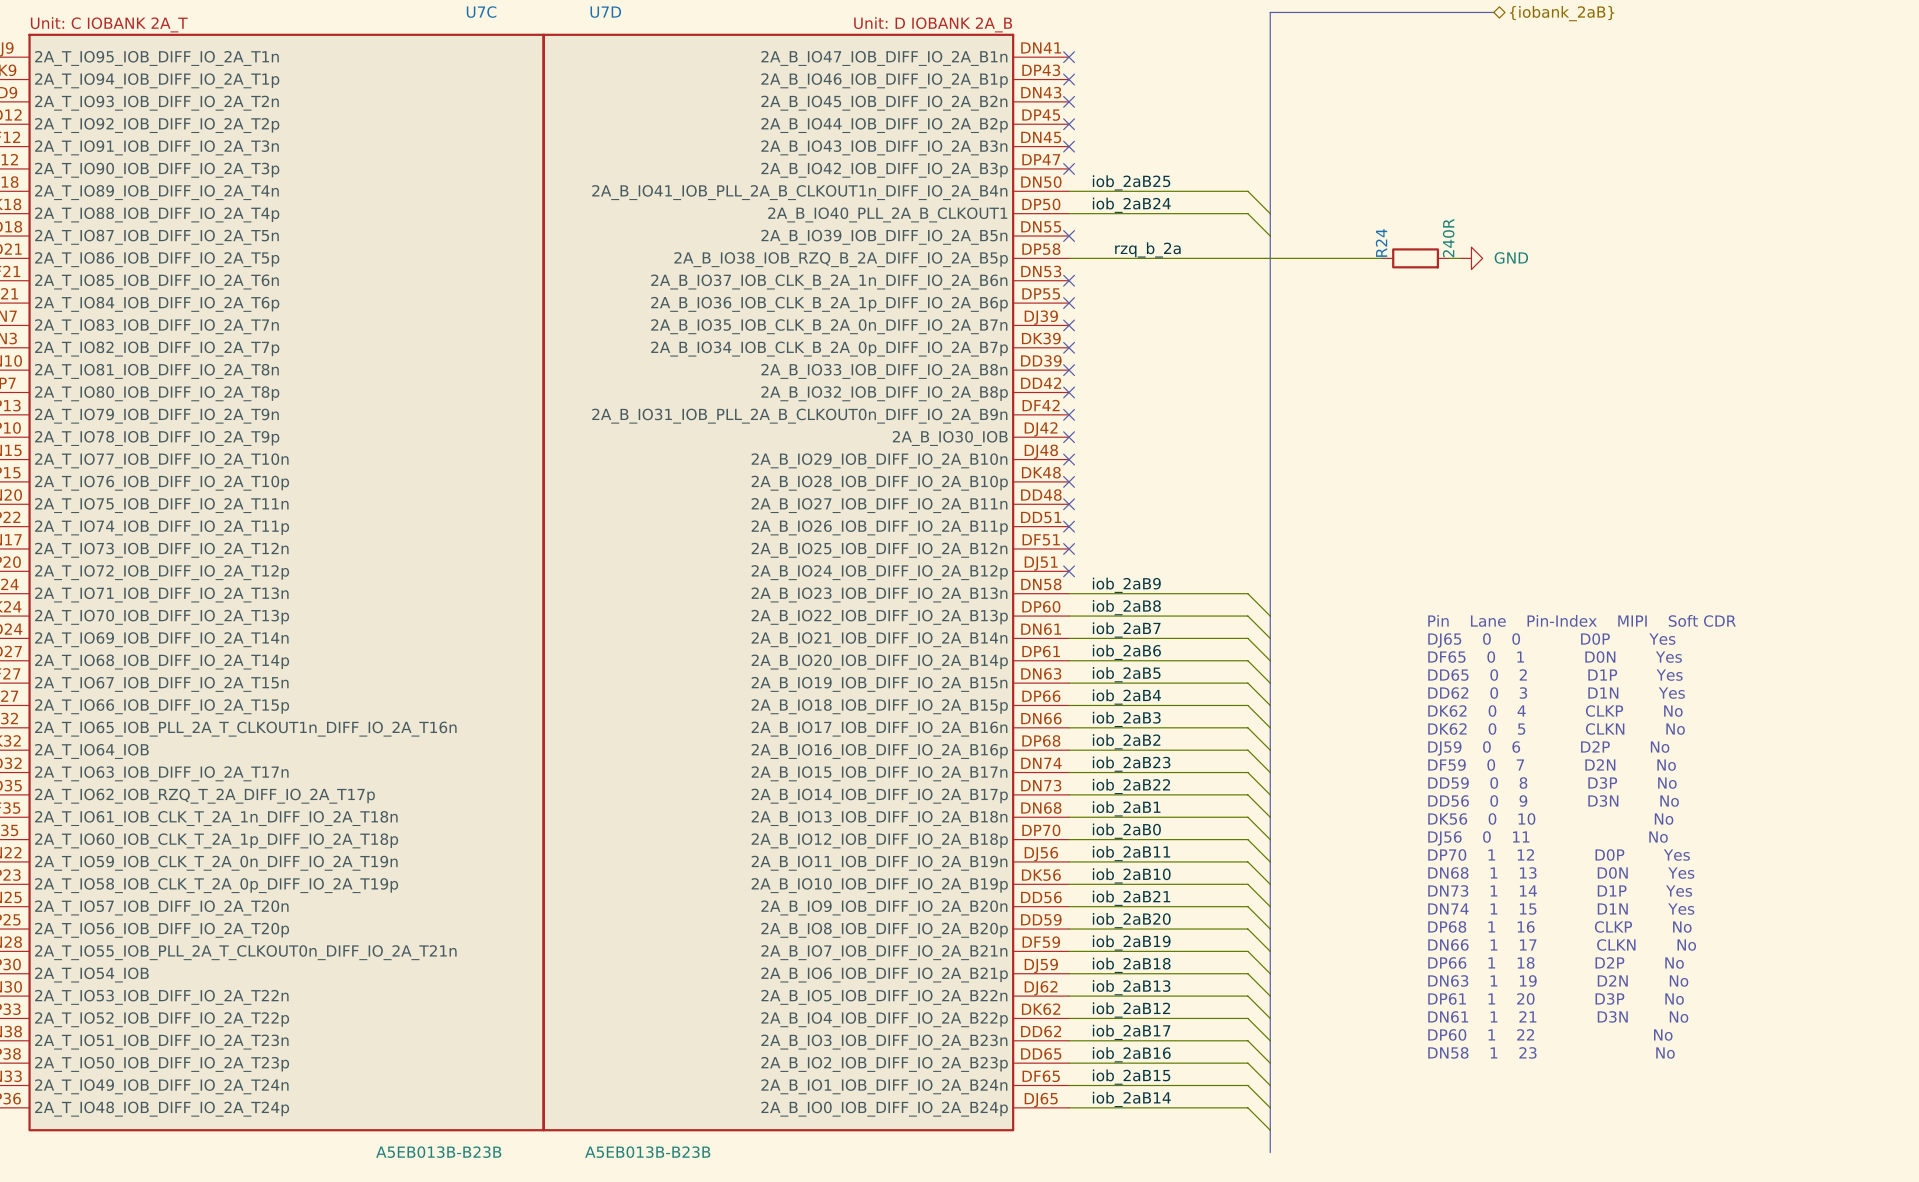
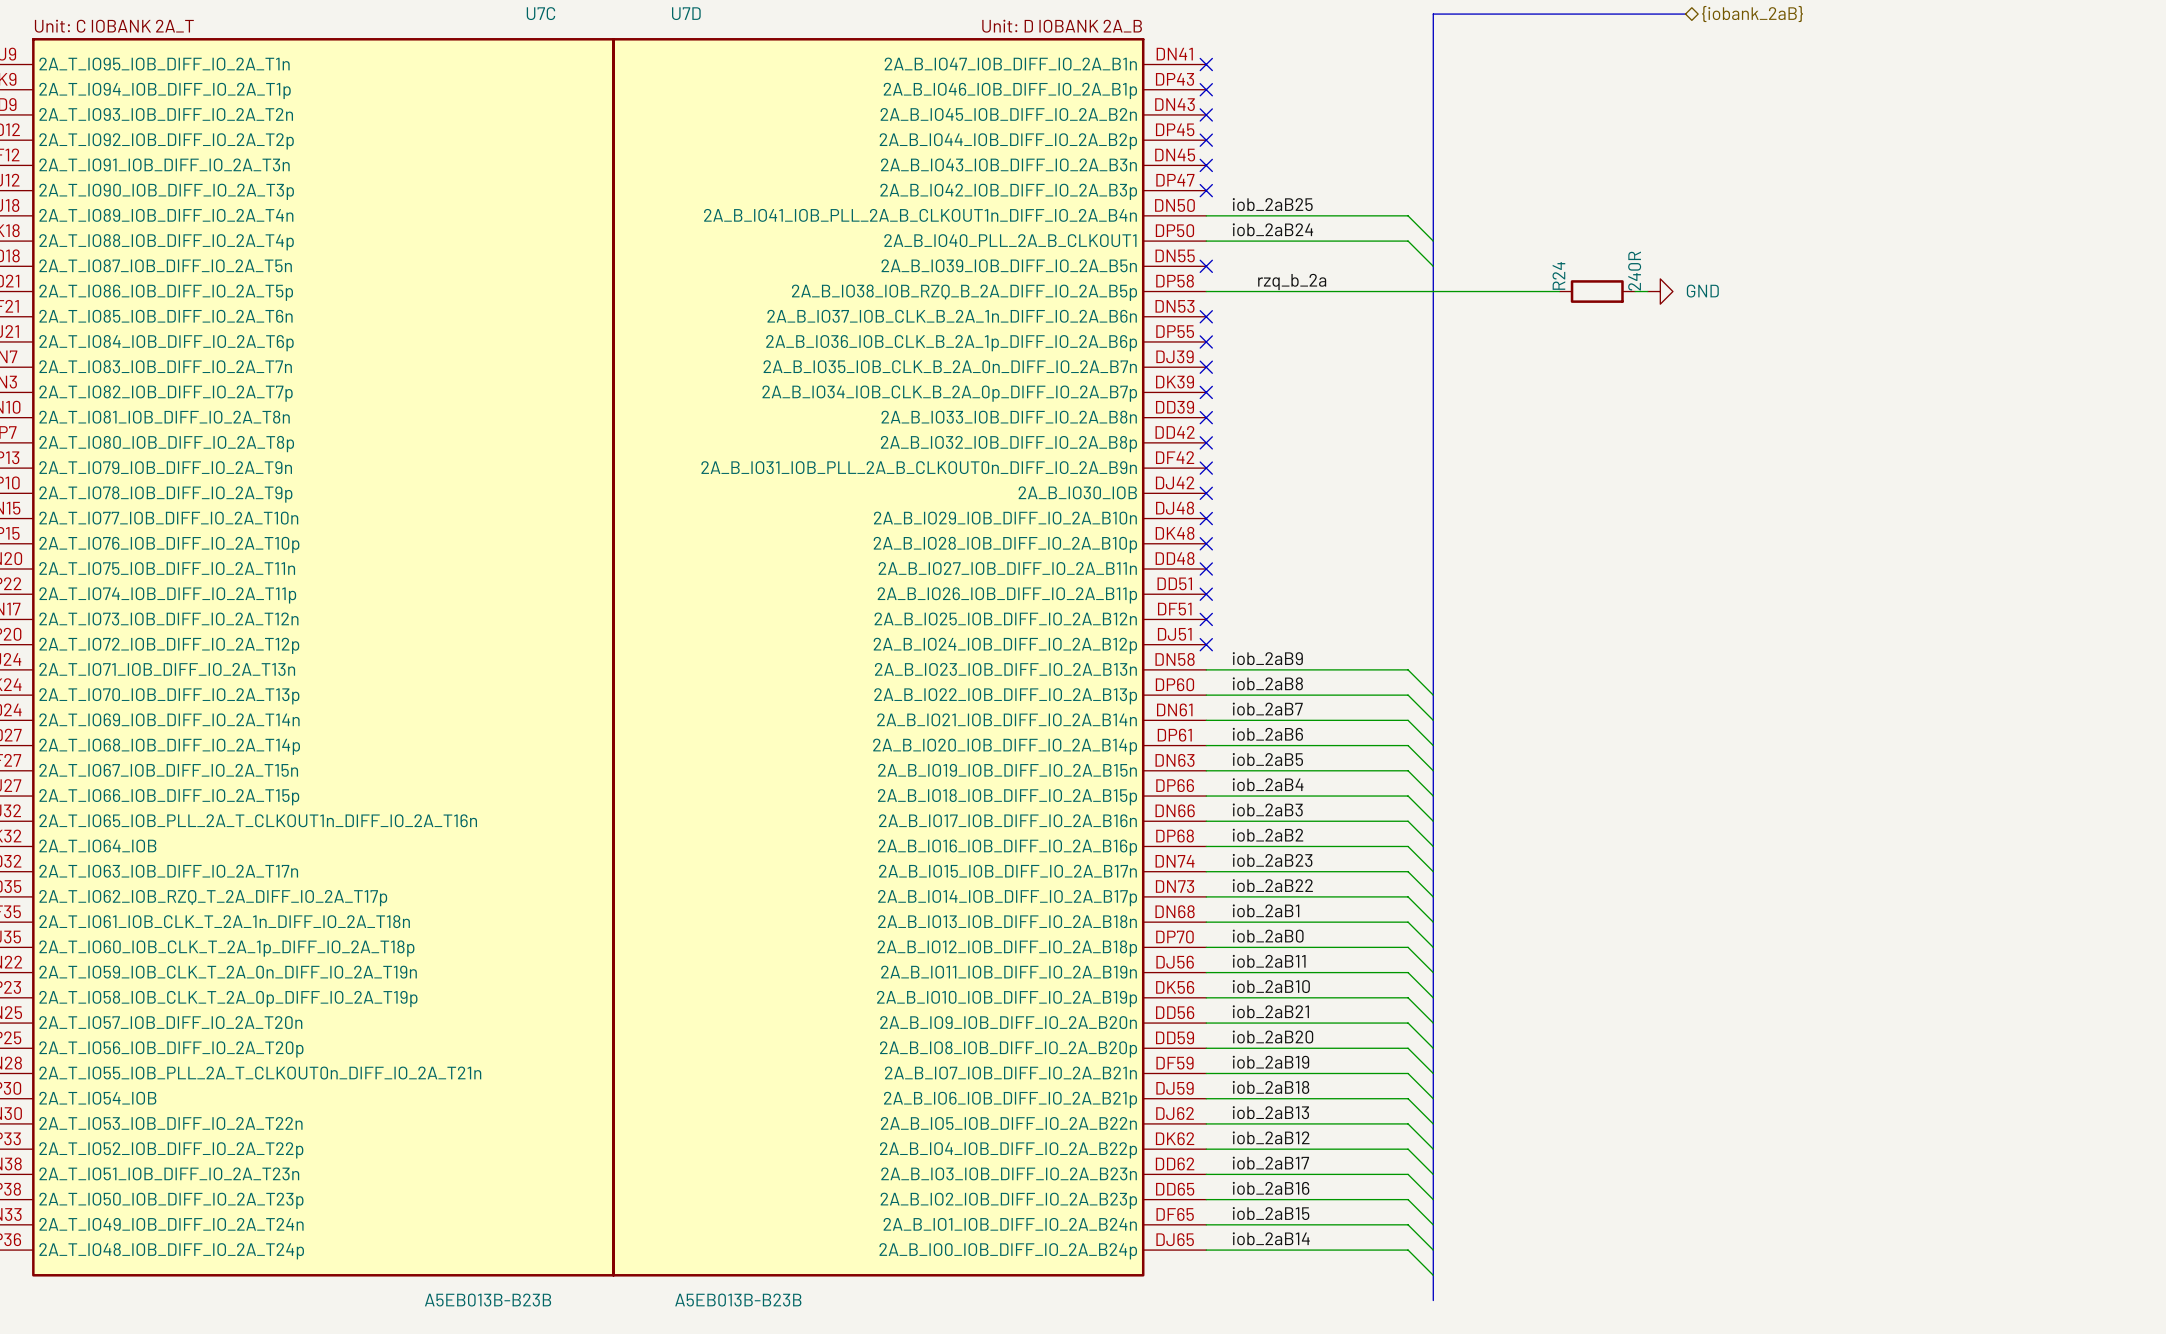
text: Pin Lane Pin-Index MIPI Soft CDR (1582, 620) -> none
text: DJ65 0 0 D0P Yes (1551, 640) -> none
text: DF65 0 1 D0N Yes (1555, 657) -> none
text: DD65 0 2 D1P Yes (1555, 675) -> none
text: DD62 0 3 D1N Yes (1556, 693) -> none
text: DK62 0 4 CLKP No (1555, 711) -> none
text: DK62 0 5 CLKN No (1556, 729) -> none
text: DJ59 0 6 D2P No (1548, 748) -> none
text: DF59 0 7 D2N No (1552, 765) -> none
text: DD59 0 8 D3P No (1552, 783) -> none
text: DD56 0 9 D3N No (1553, 801) -> none
text: DK56 0 10 No (1550, 818) -> none
text: DJ56 0 11 No (1548, 838) -> none
text: DP70 1 12 D0P Yes (1559, 854) -> none
text: DN68 1 13 D0N Yes (1561, 872) -> none
text: DN73 1 14 D1P Yes (1560, 890) -> none
text: DN74 1 15 D1N Yes (1561, 909) -> none
text: DP68 1 16 CLKP No (1559, 926) -> none
text: DN66 1 17 CLKN No (1562, 944) -> none
text: DP66 1 18 D2P No (1556, 962) -> none
text: DN63 1 19 D2N No (1558, 980) -> none
text: DP61 1 20 D3P No (1556, 998) -> none
text: DN61 1 21 D3N No (1558, 1016) -> none
text: DP60 1 22 No (1550, 1034) -> none
text: DN58 1 23 No (1551, 1052) -> none

